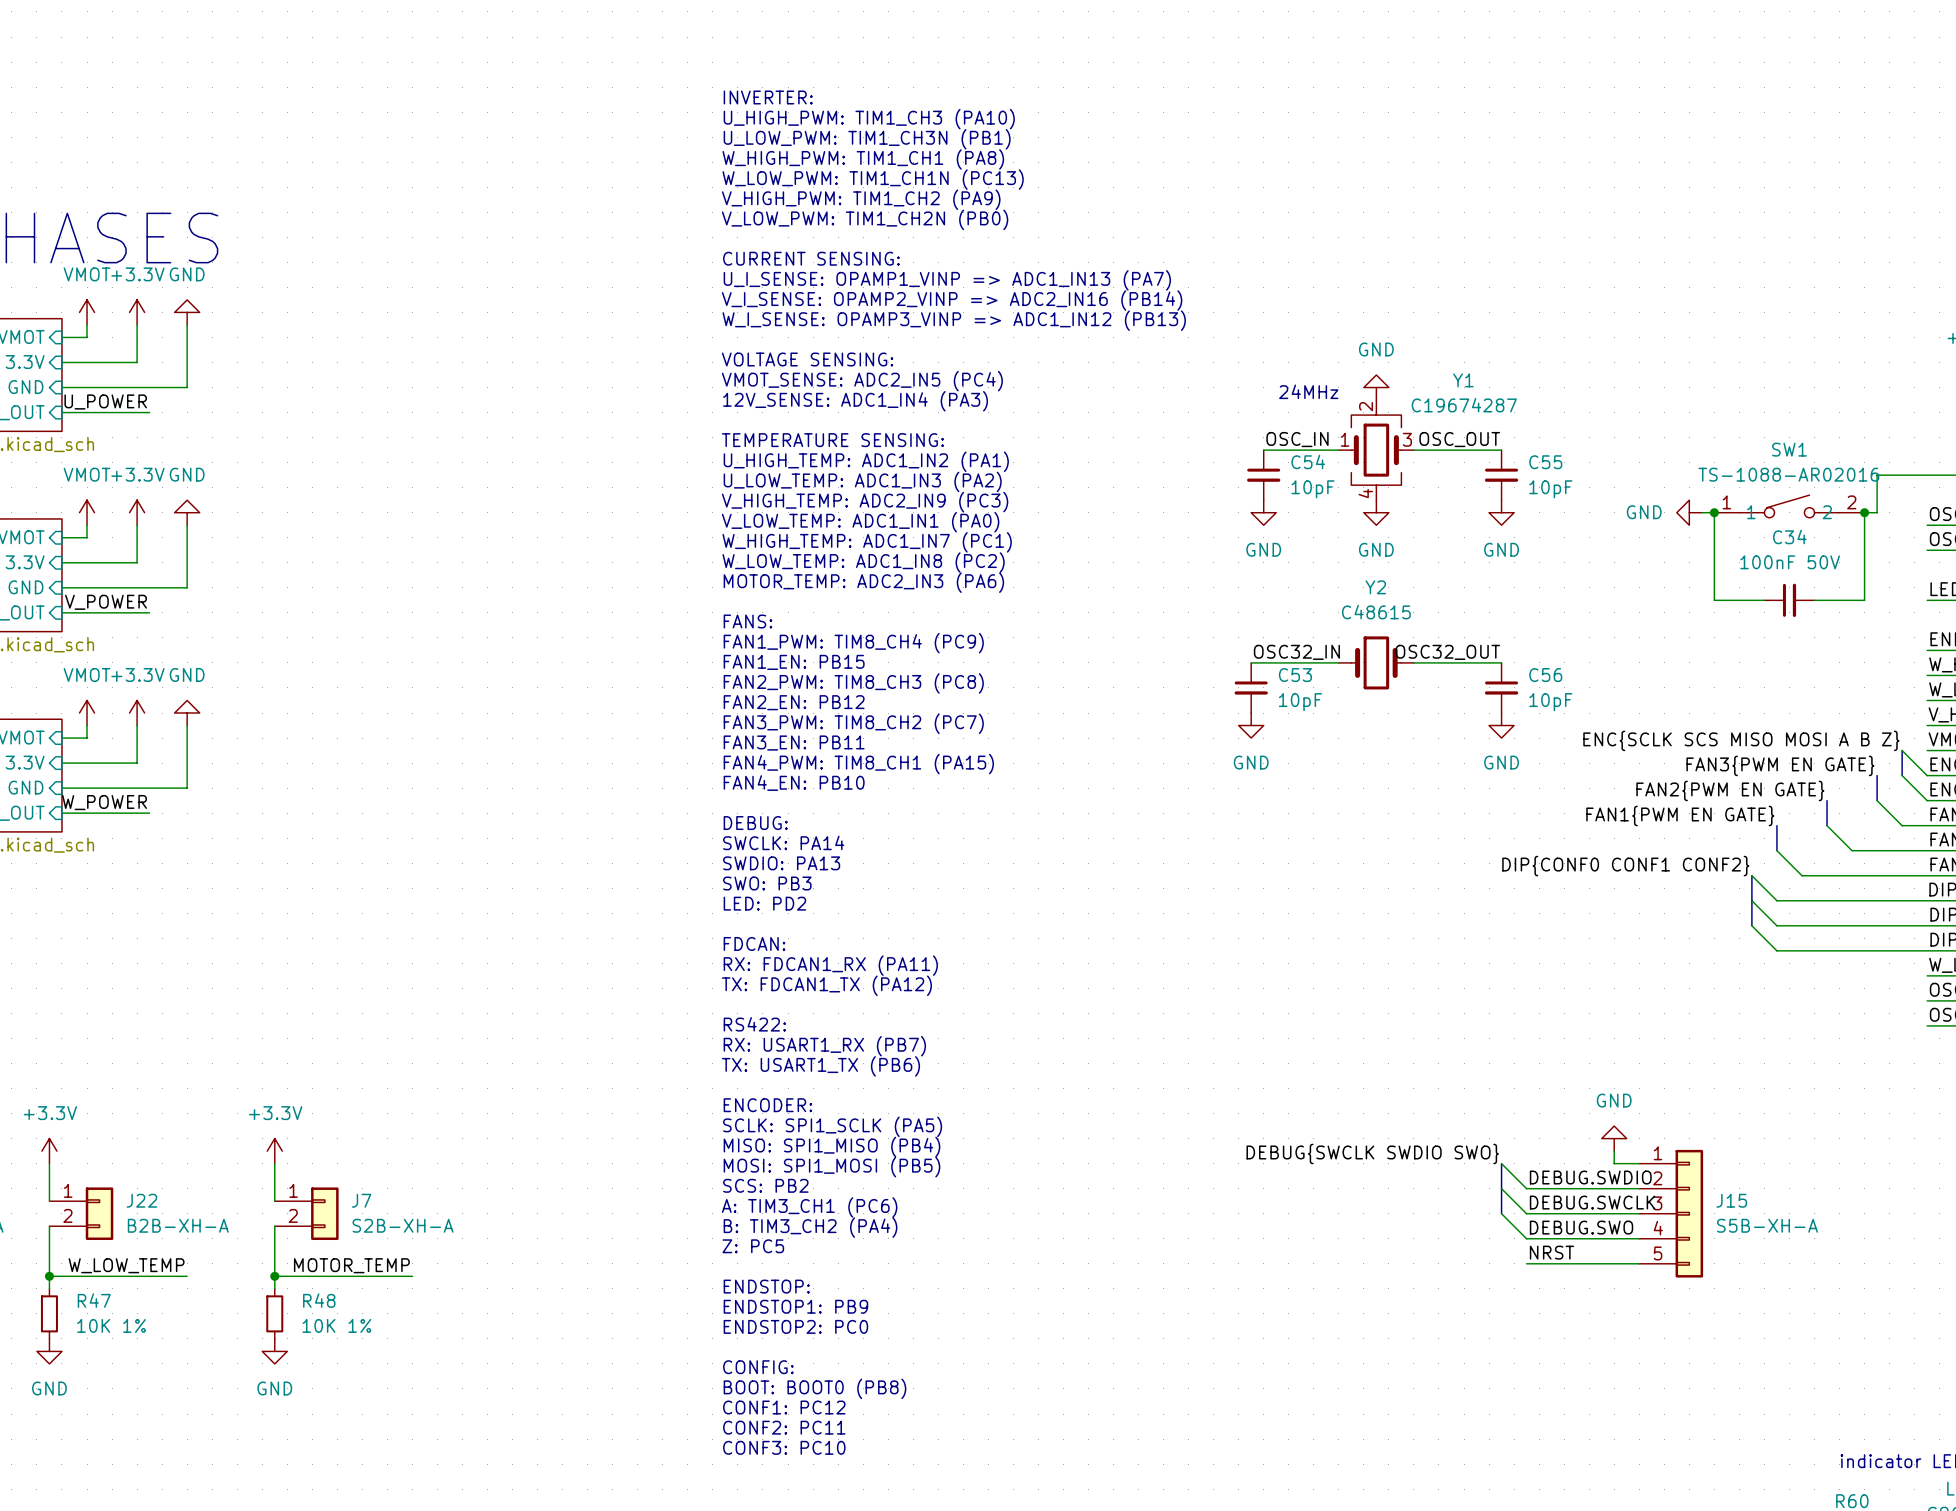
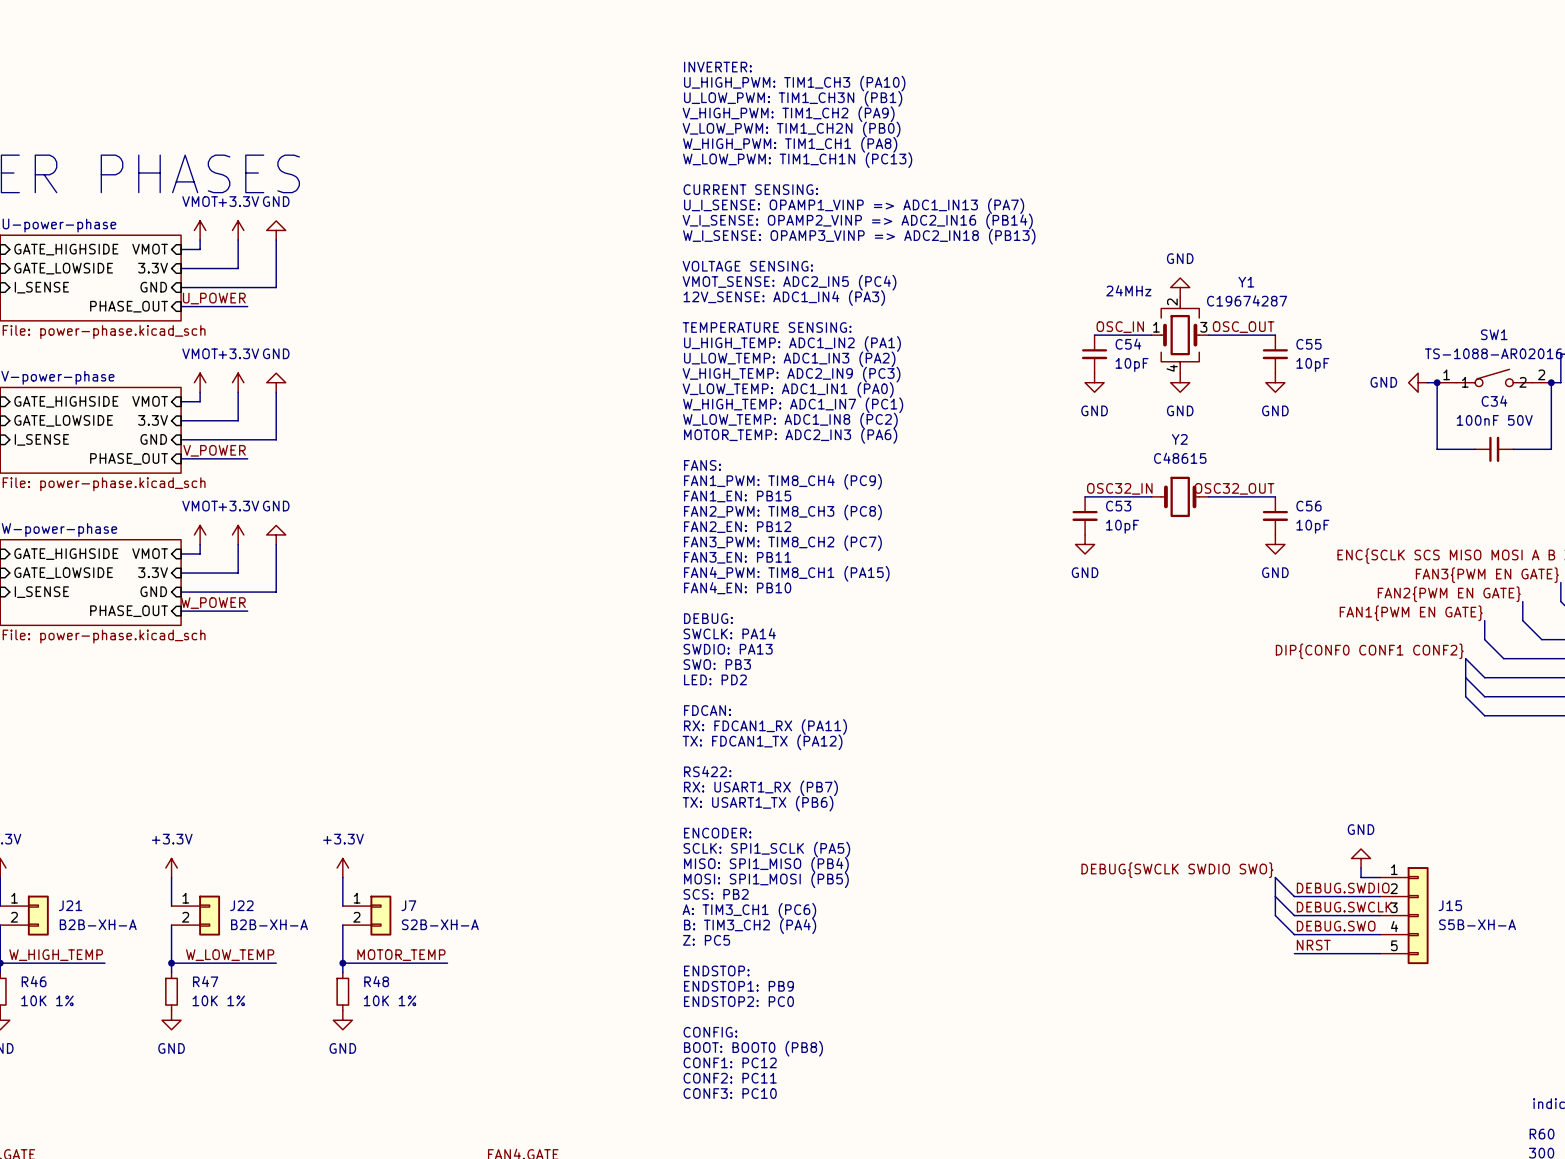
text: W_HIGH_PWM: TIM1_CH1 (PA8) (863, 159) -> V_HIGH_PWM: TIM1_CH2 (PA9) (788, 114)
text: W_LOW_PWM: TIM1_CH1N (PC13) (873, 179) -> V_LOW_PWM: TIM1_CH2N (PB0) (791, 129)
text: V_HIGH_PWM: TIM1_CH2 (PA9) (861, 199) -> W_HIGH_PWM: TIM1_CH1 (PA8) (790, 144)
text: V_LOW_PWM: TIM1_CH2N (PB0) (865, 219) -> W_LOW_PWM: TIM1_CH1N (PC13) (797, 160)
text: W_I_SENSE: OPAMP3_VINP => ADC1_IN12 (PB13) (954, 320) -> W_I_SENSE: OPAMP3_VINP => ADC2_IN18 (PB13) (859, 236)

